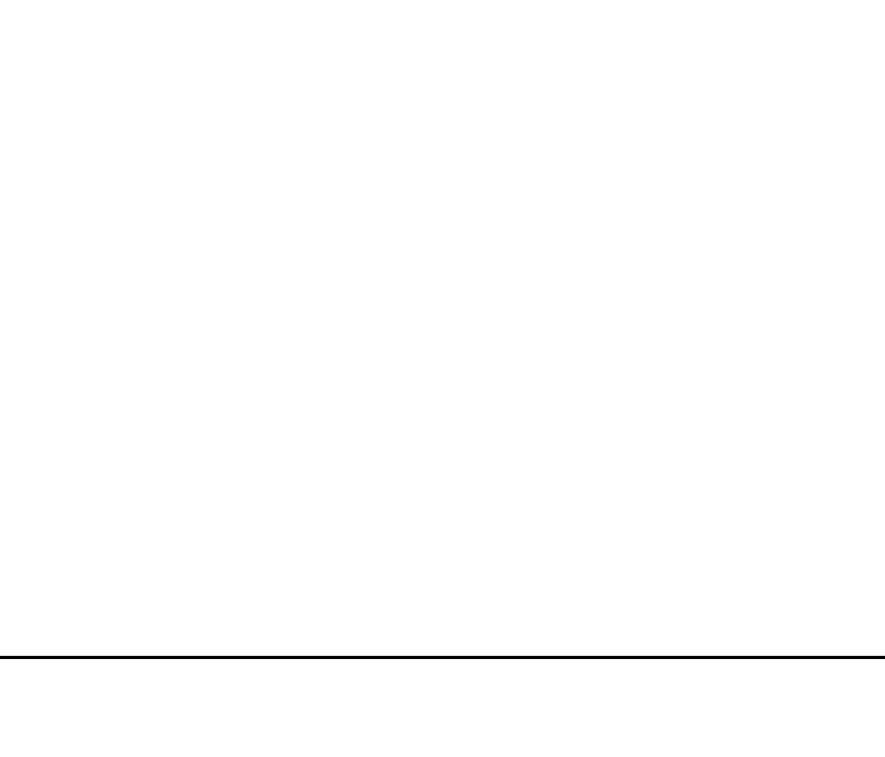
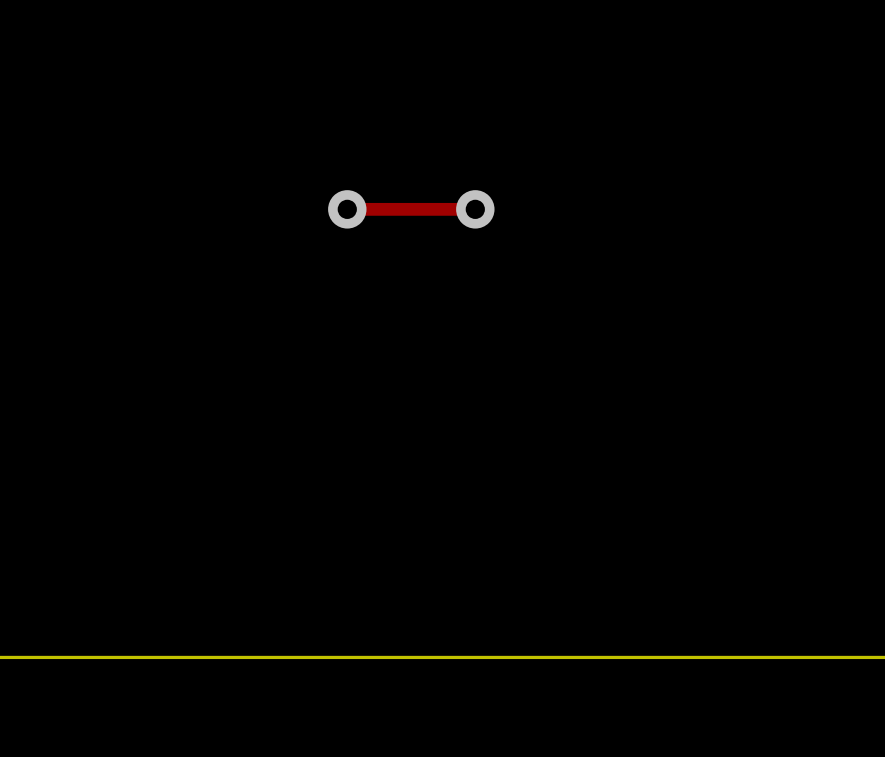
track: none -> (347, 209) (475, 209)
via: none -> (347, 209)
via: none -> (475, 209)

